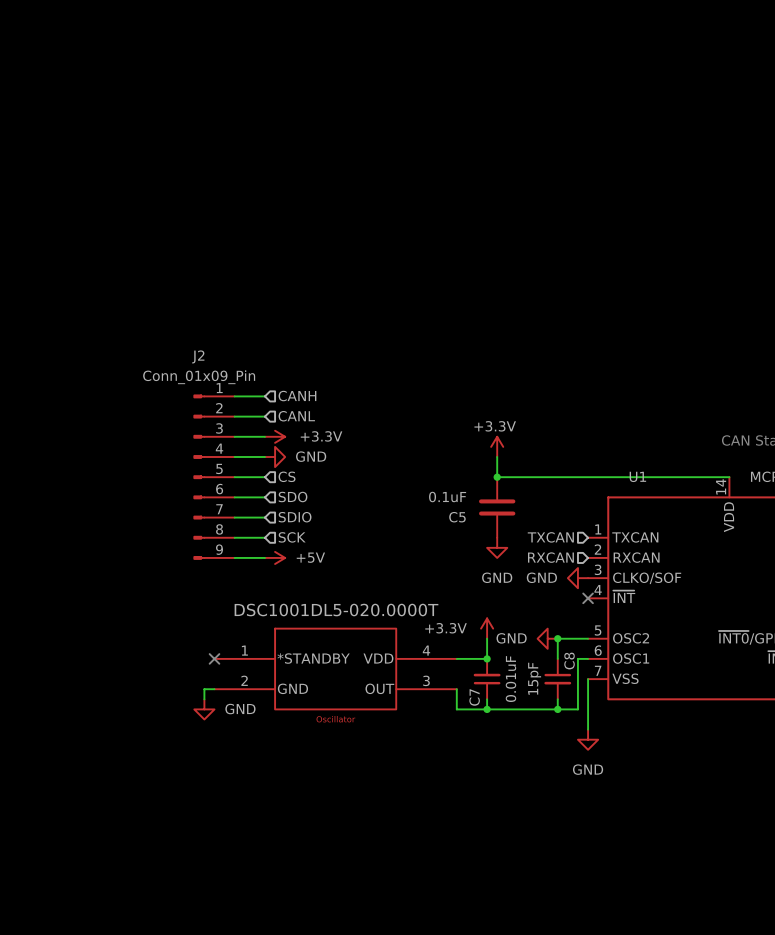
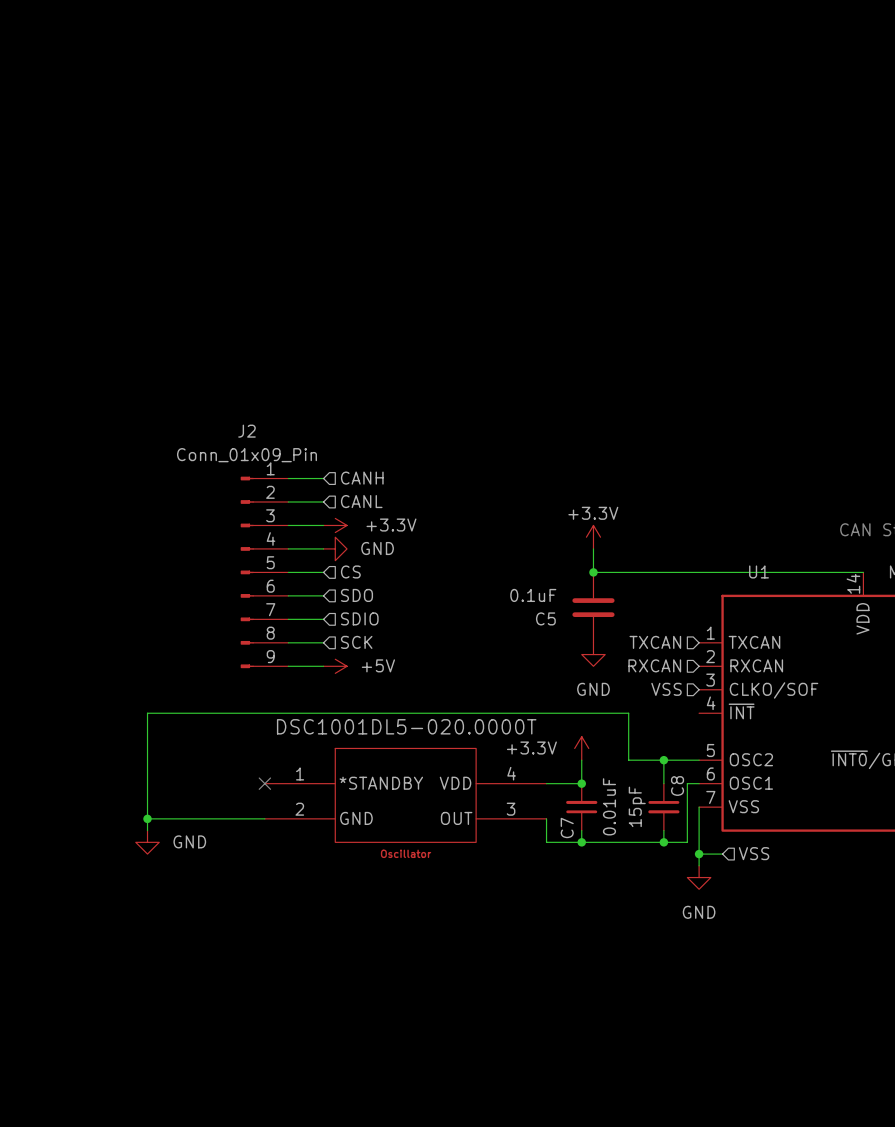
hierarchical label: none -> VSS (666, 689)
power symbol: GND (577, 578) -> none
no-connect mark: (588, 598) -> none
power symbol: GND (547, 638) -> none
wire: none -> (663, 760) (628, 760) (628, 713) (147, 713) (147, 830)
junction: none -> (147, 818)
wire: (204, 689) (204, 699) -> (253, 818) (147, 818)
power symbol position: GND (204, 709) -> GND (147, 842)
wire: none -> (699, 854) (722, 854)
junction: none -> (699, 854)
hierarchical label: none -> VSS (754, 853)

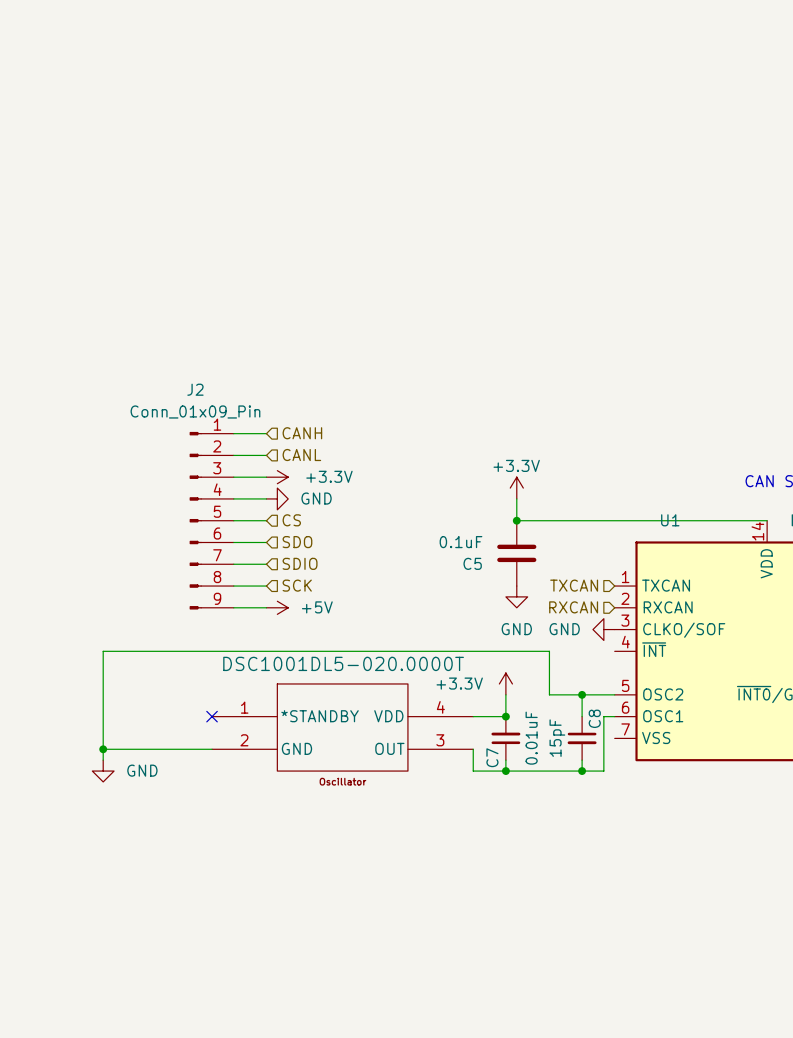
hierarchical label: VSS (666, 689) -> none
wire: (699, 807) (699, 865) -> none
hierarchical label: VSS (754, 853) -> none
wire: (699, 854) (722, 854) -> none
junction: (699, 854) -> none
power symbol rotation: 0° (699, 877) -> 90° clockwise (603, 629)
power symbol position: GND (699, 877) -> GND (603, 629)

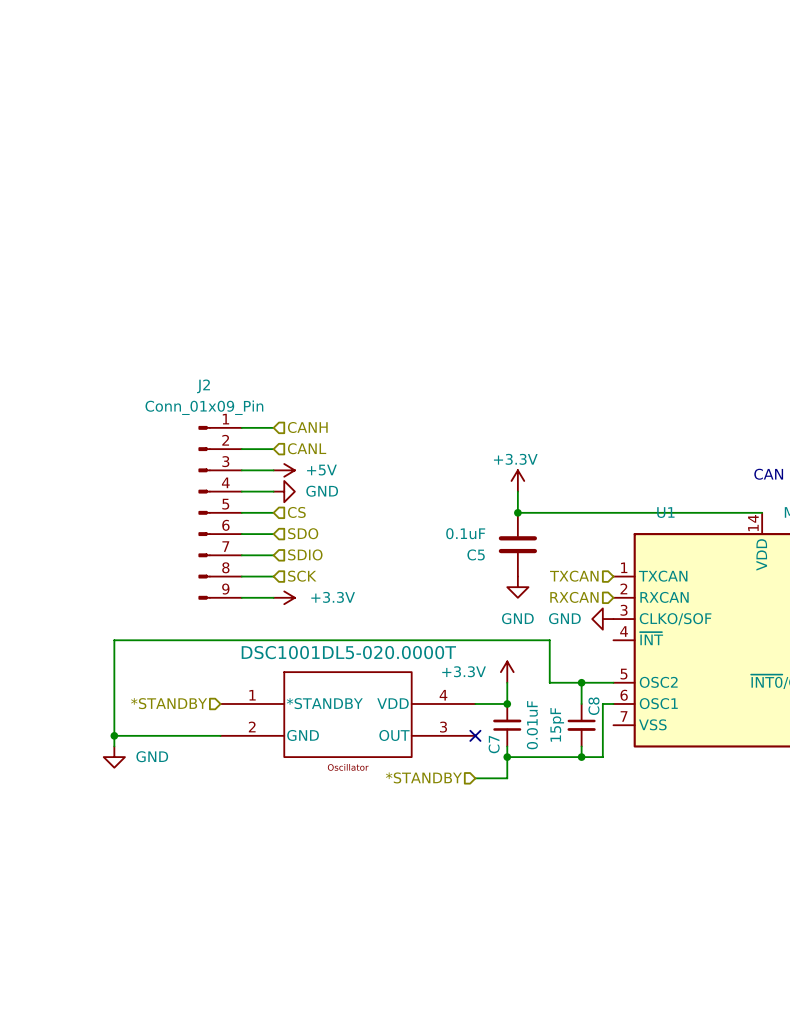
power symbol: +3.3V (277, 477) -> +5V (284, 470)
power symbol: +5V (277, 607) -> +3.3V (284, 597)
hierarchical label: none -> *STANDBY (169, 703)
no-connect mark: (212, 716) -> none
wire: (473, 749) (473, 771) (505, 771) -> (475, 778) (507, 778) (507, 757)
no-connect mark: none -> (475, 735)
hierarchical label: none -> *STANDBY (423, 777)

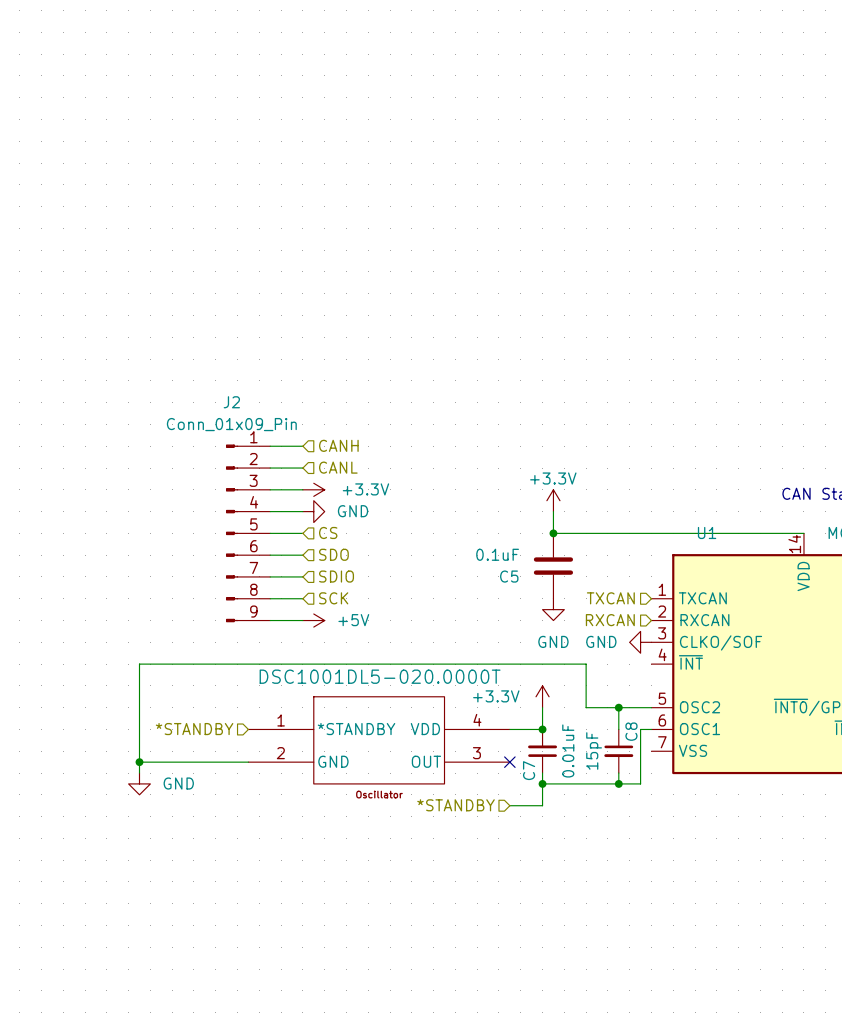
power symbol: +5V (284, 470) -> +3.3V (313, 489)
power symbol: +3.3V (284, 597) -> +5V (313, 620)

